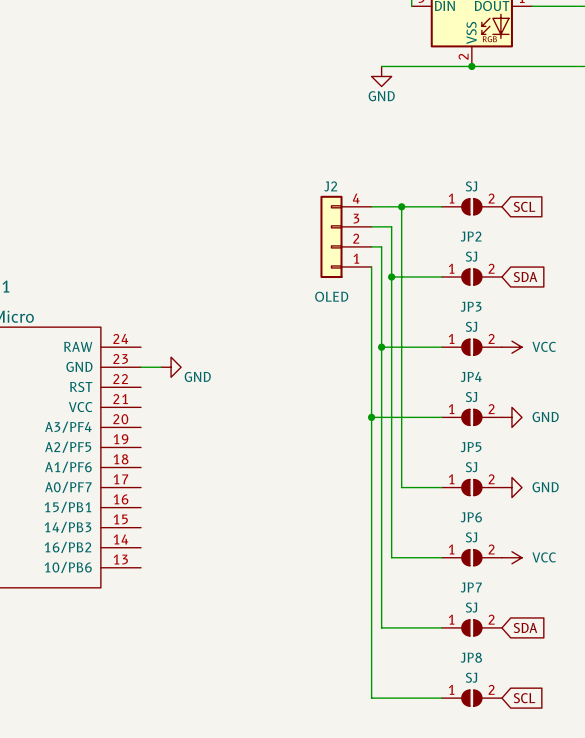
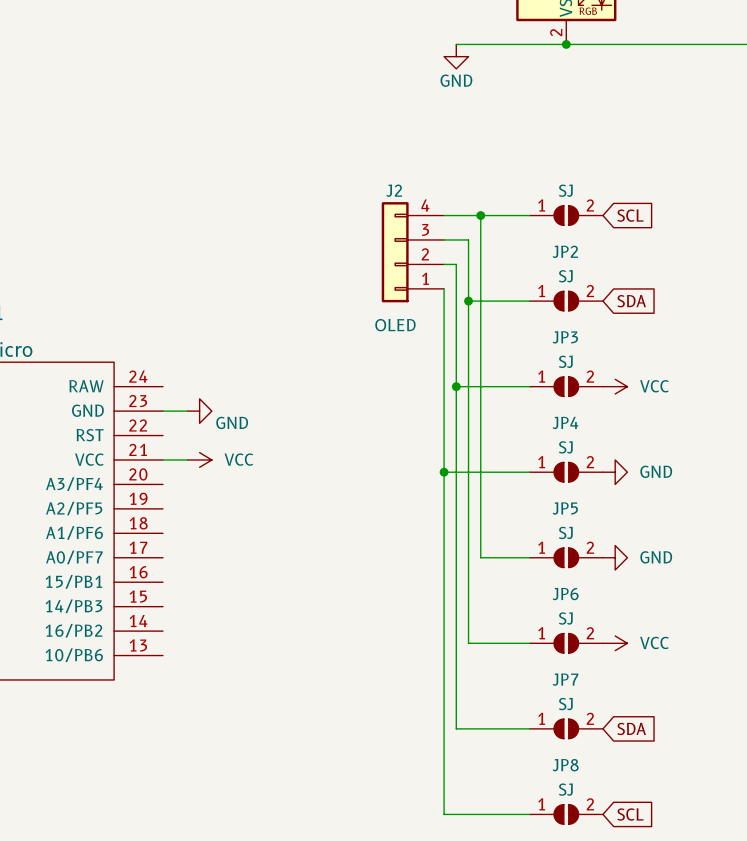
wire: none -> (162, 459) (187, 459)
power symbol: none -> VCC (199, 459)

